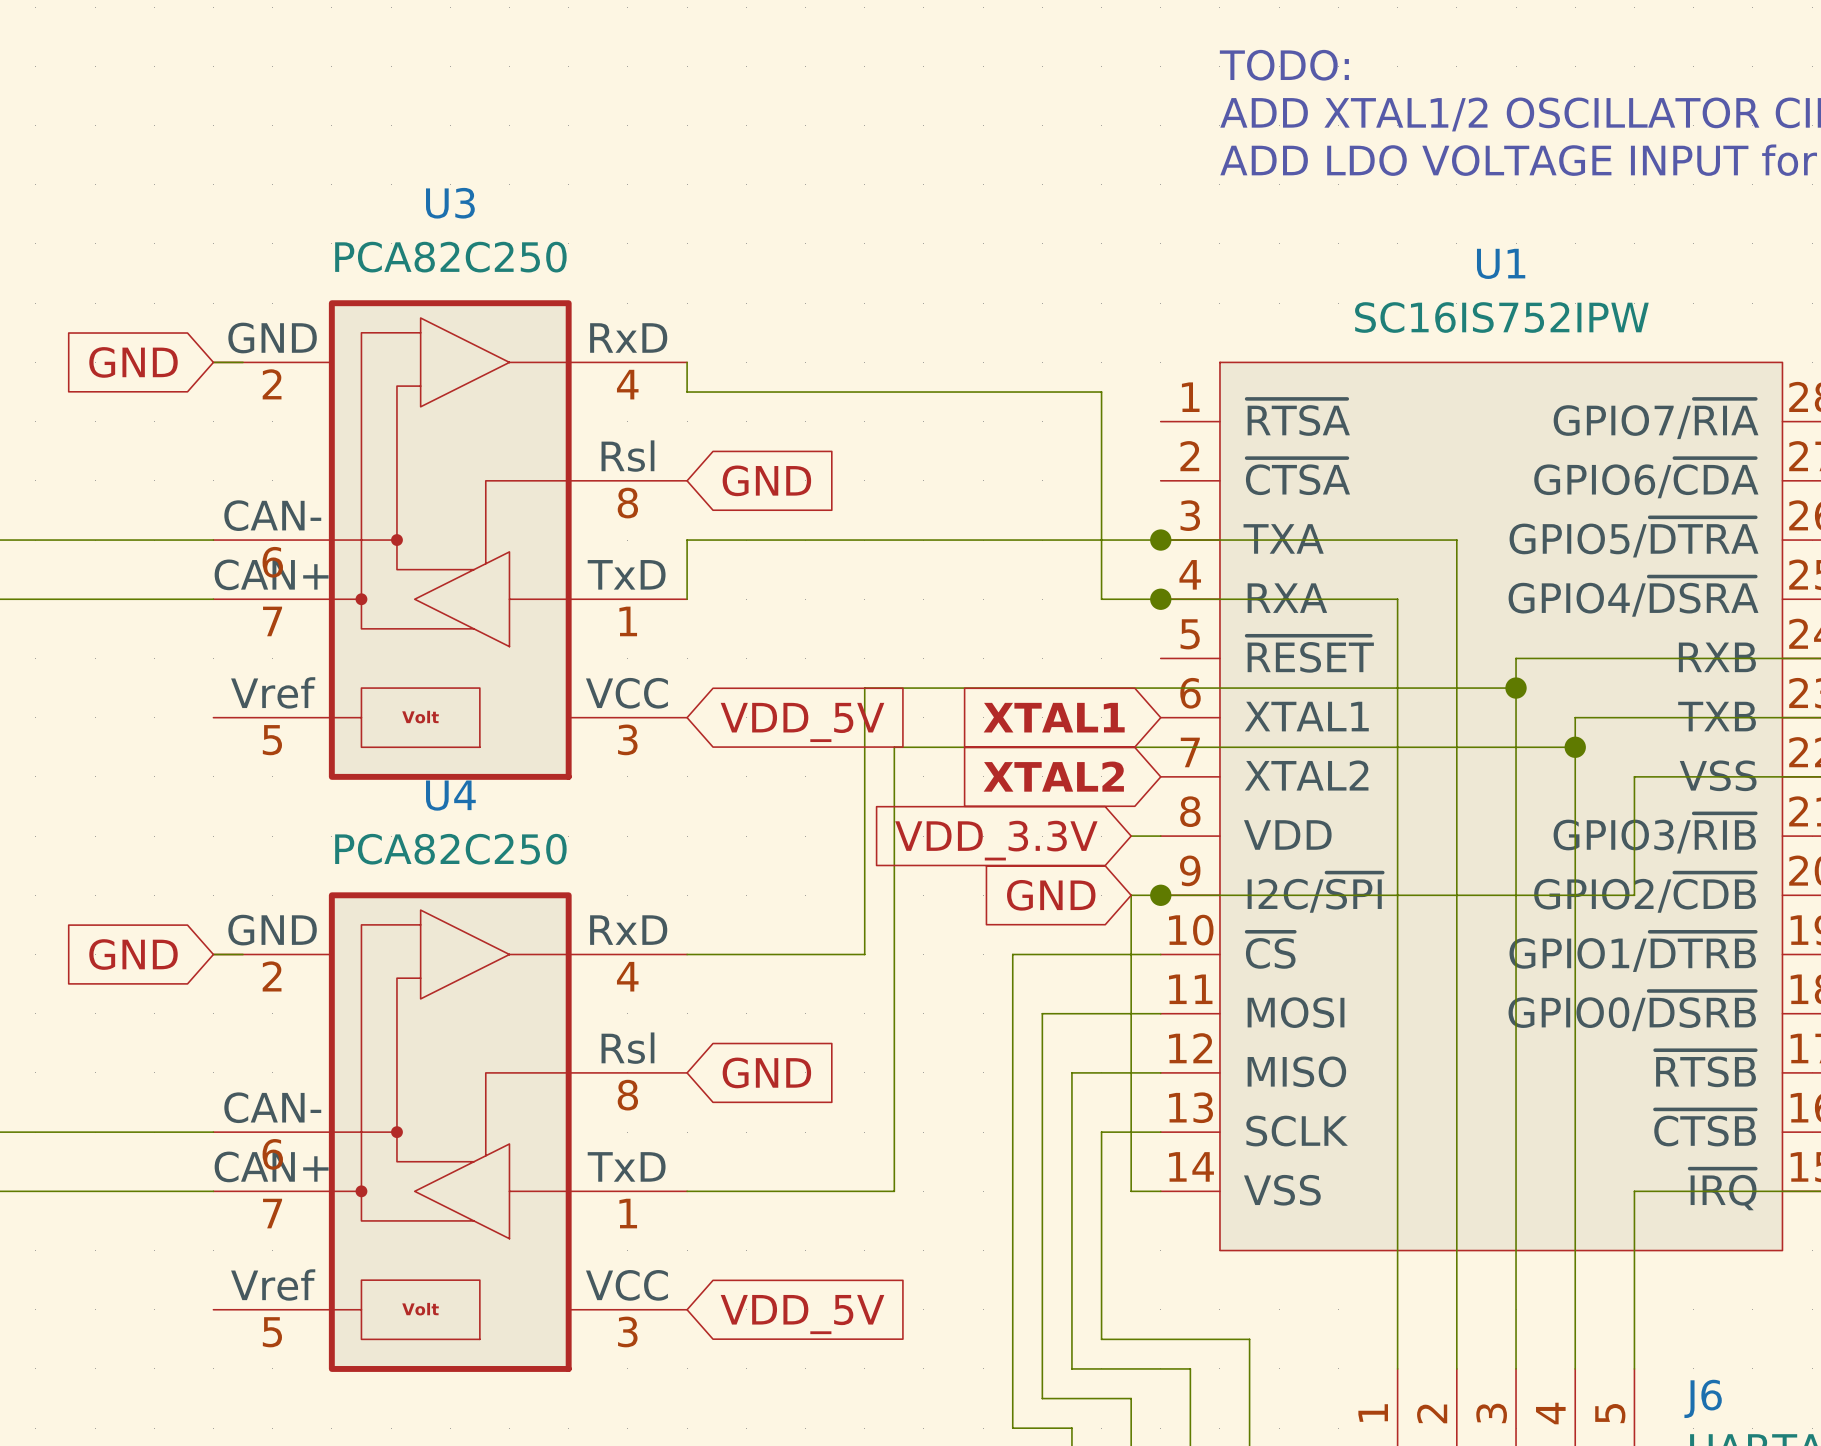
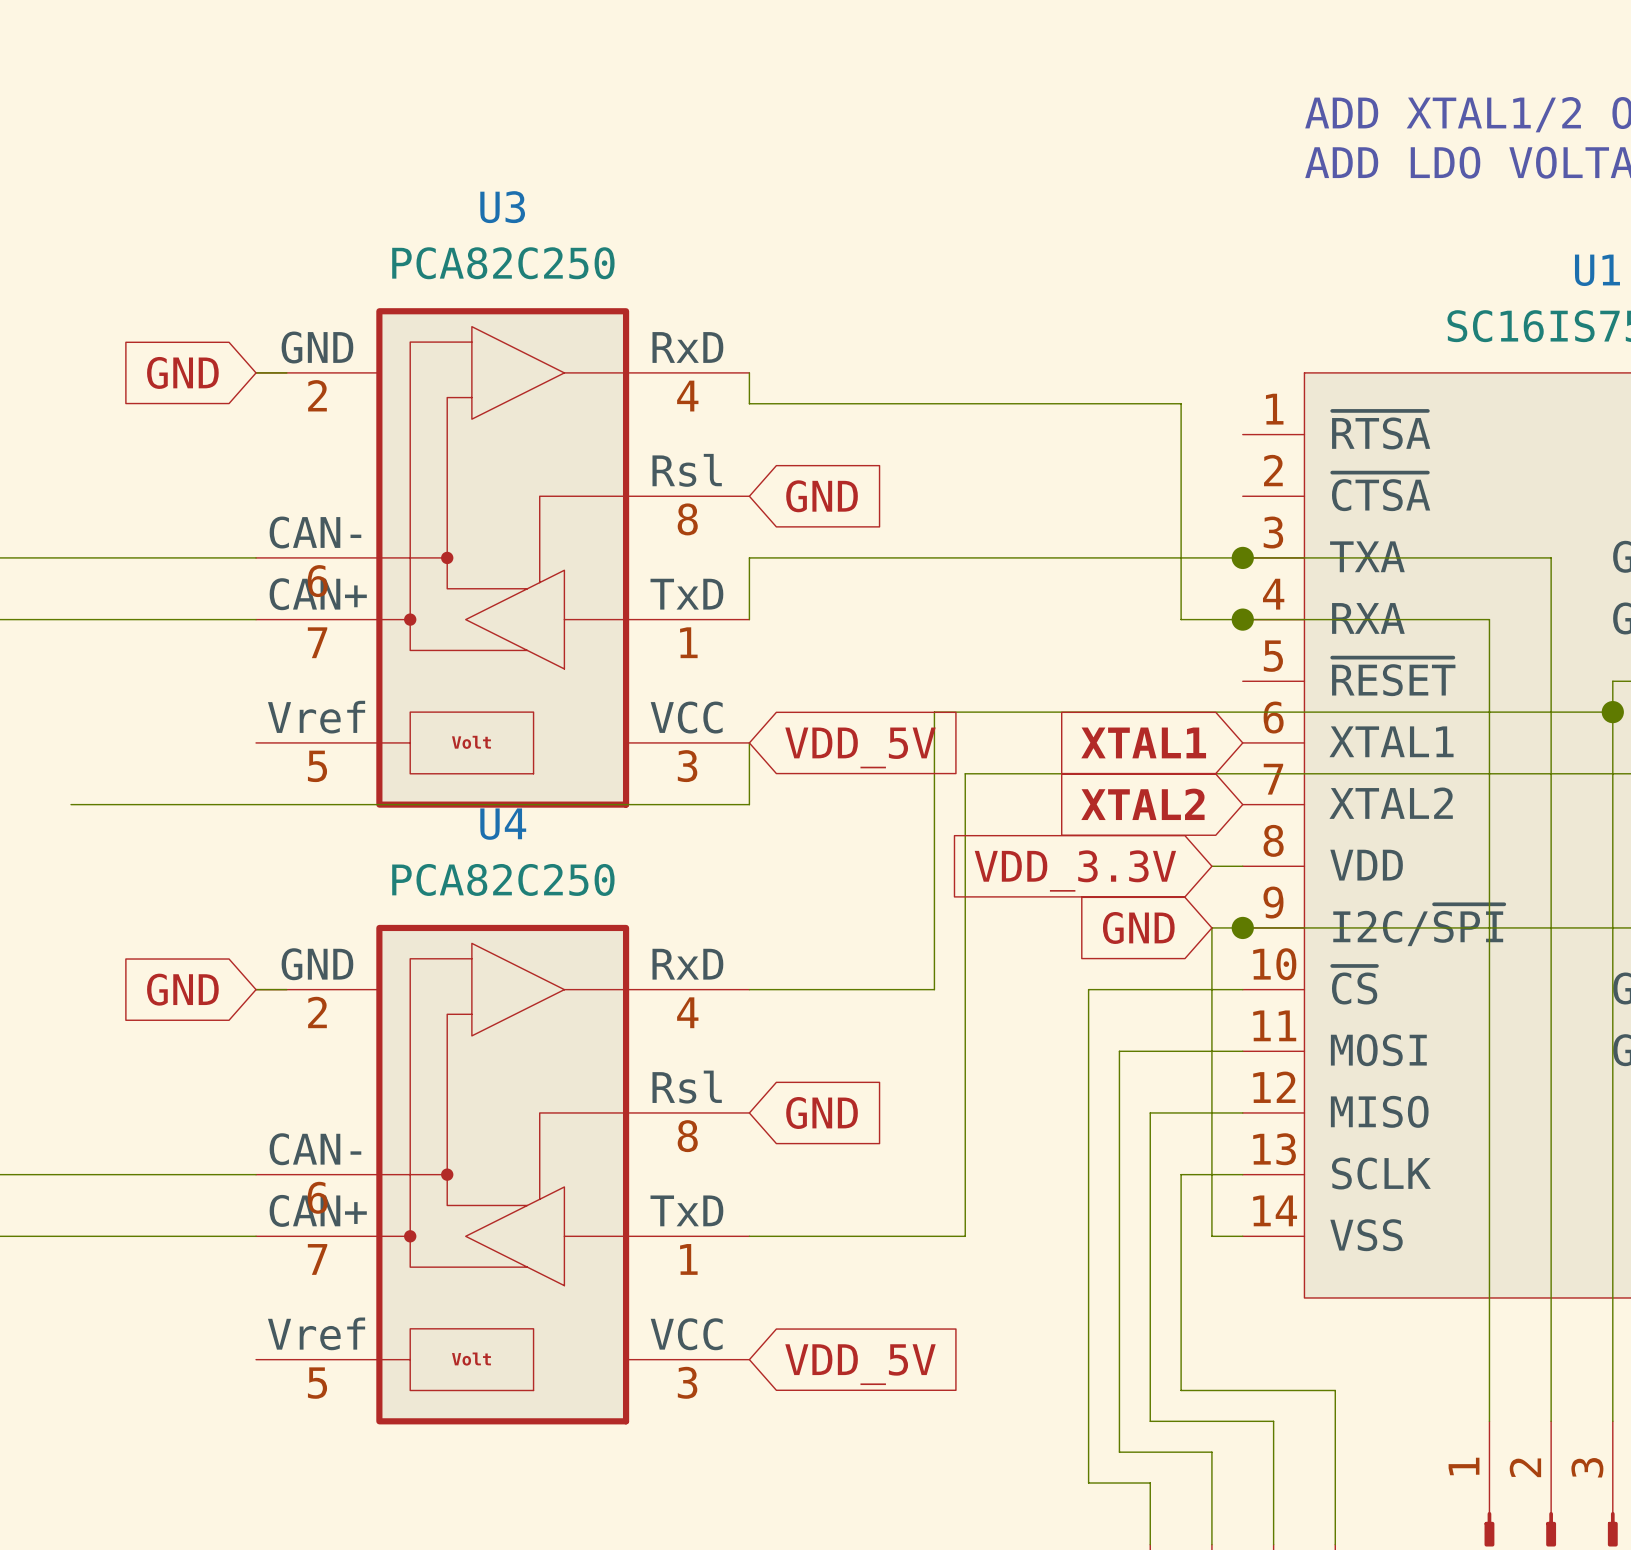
text: TODO: (1284, 65) -> none
wire: none -> (749, 742) (749, 804) (71, 804)

